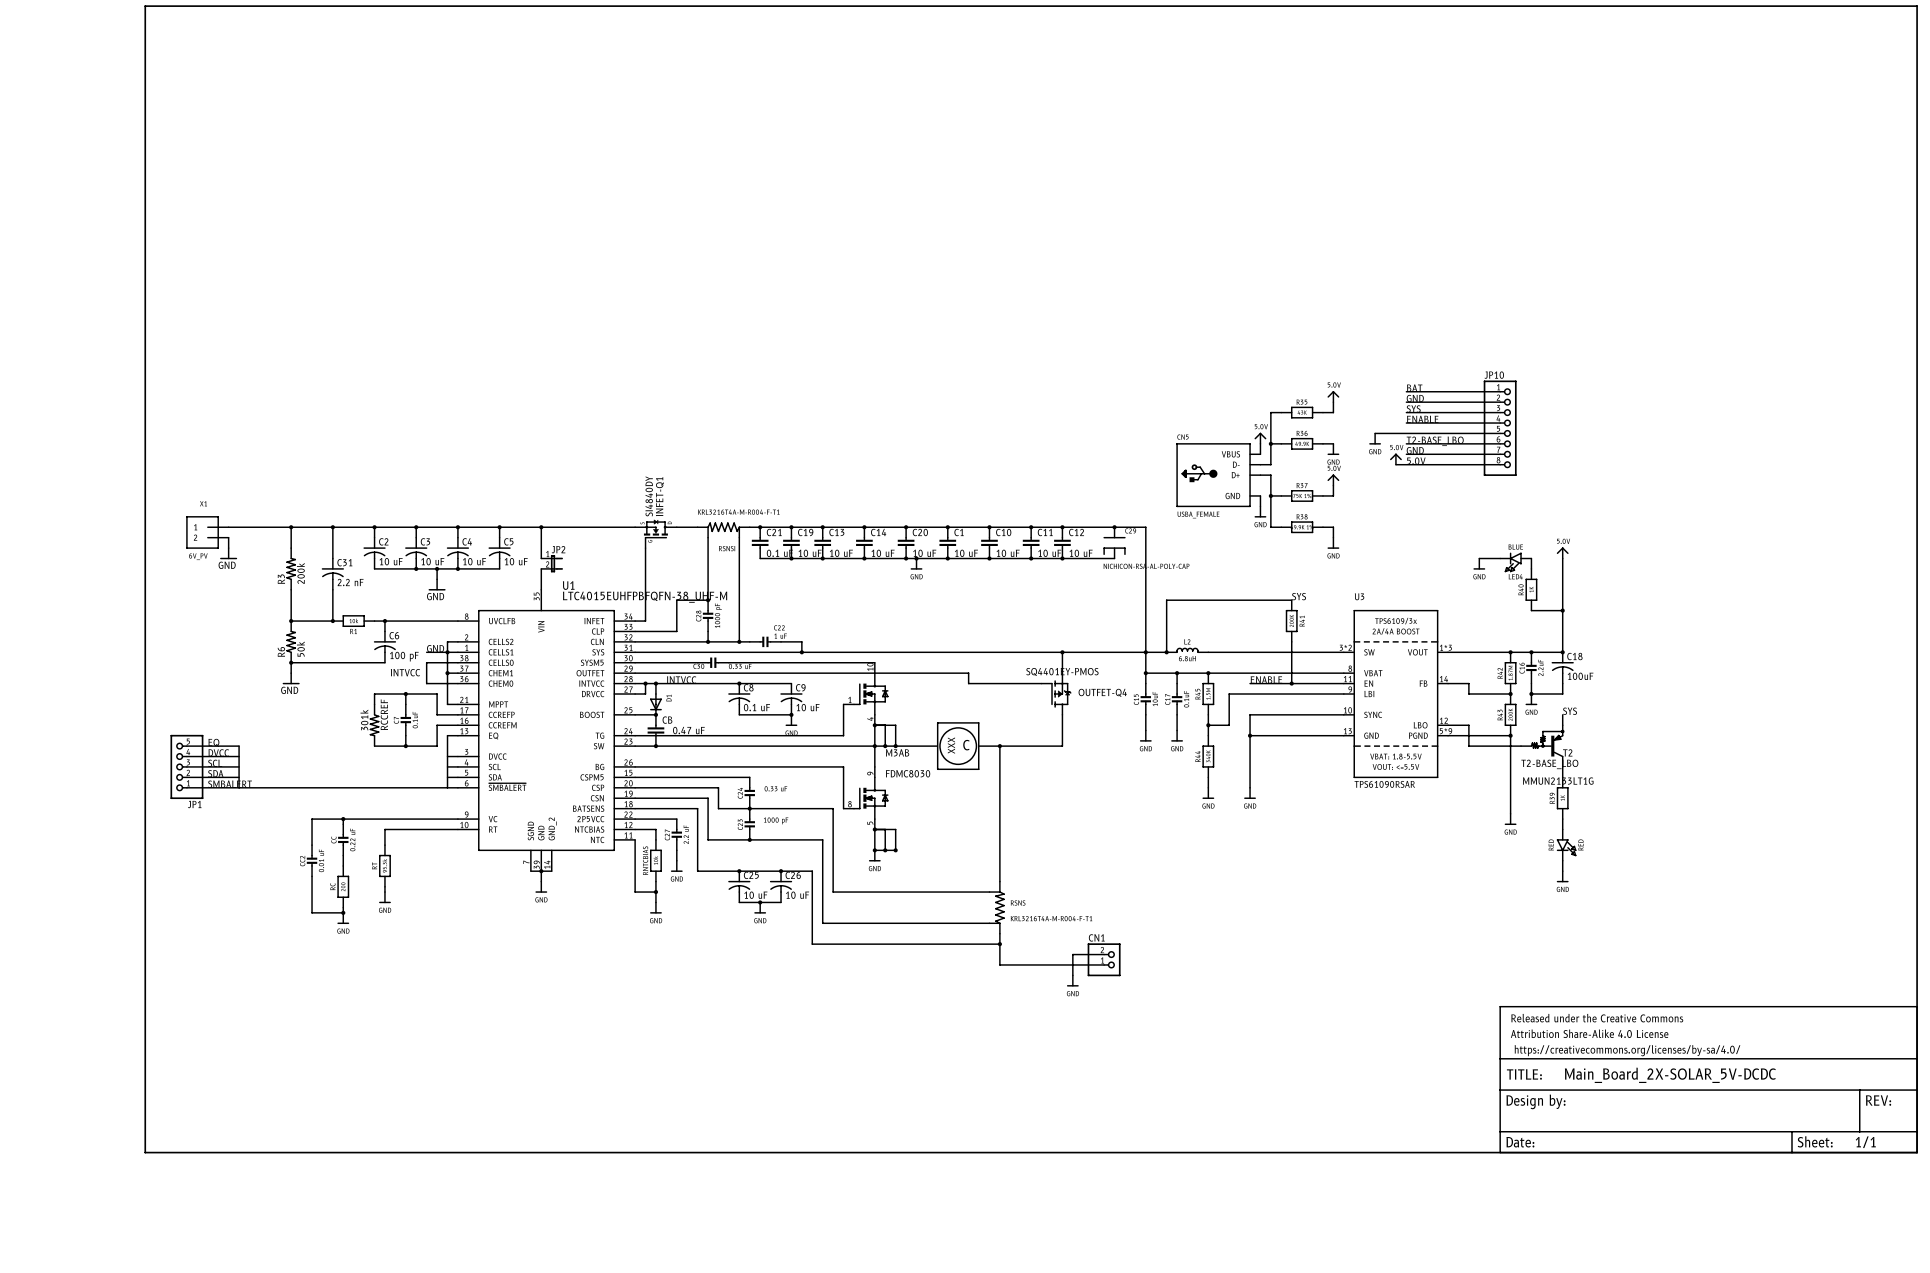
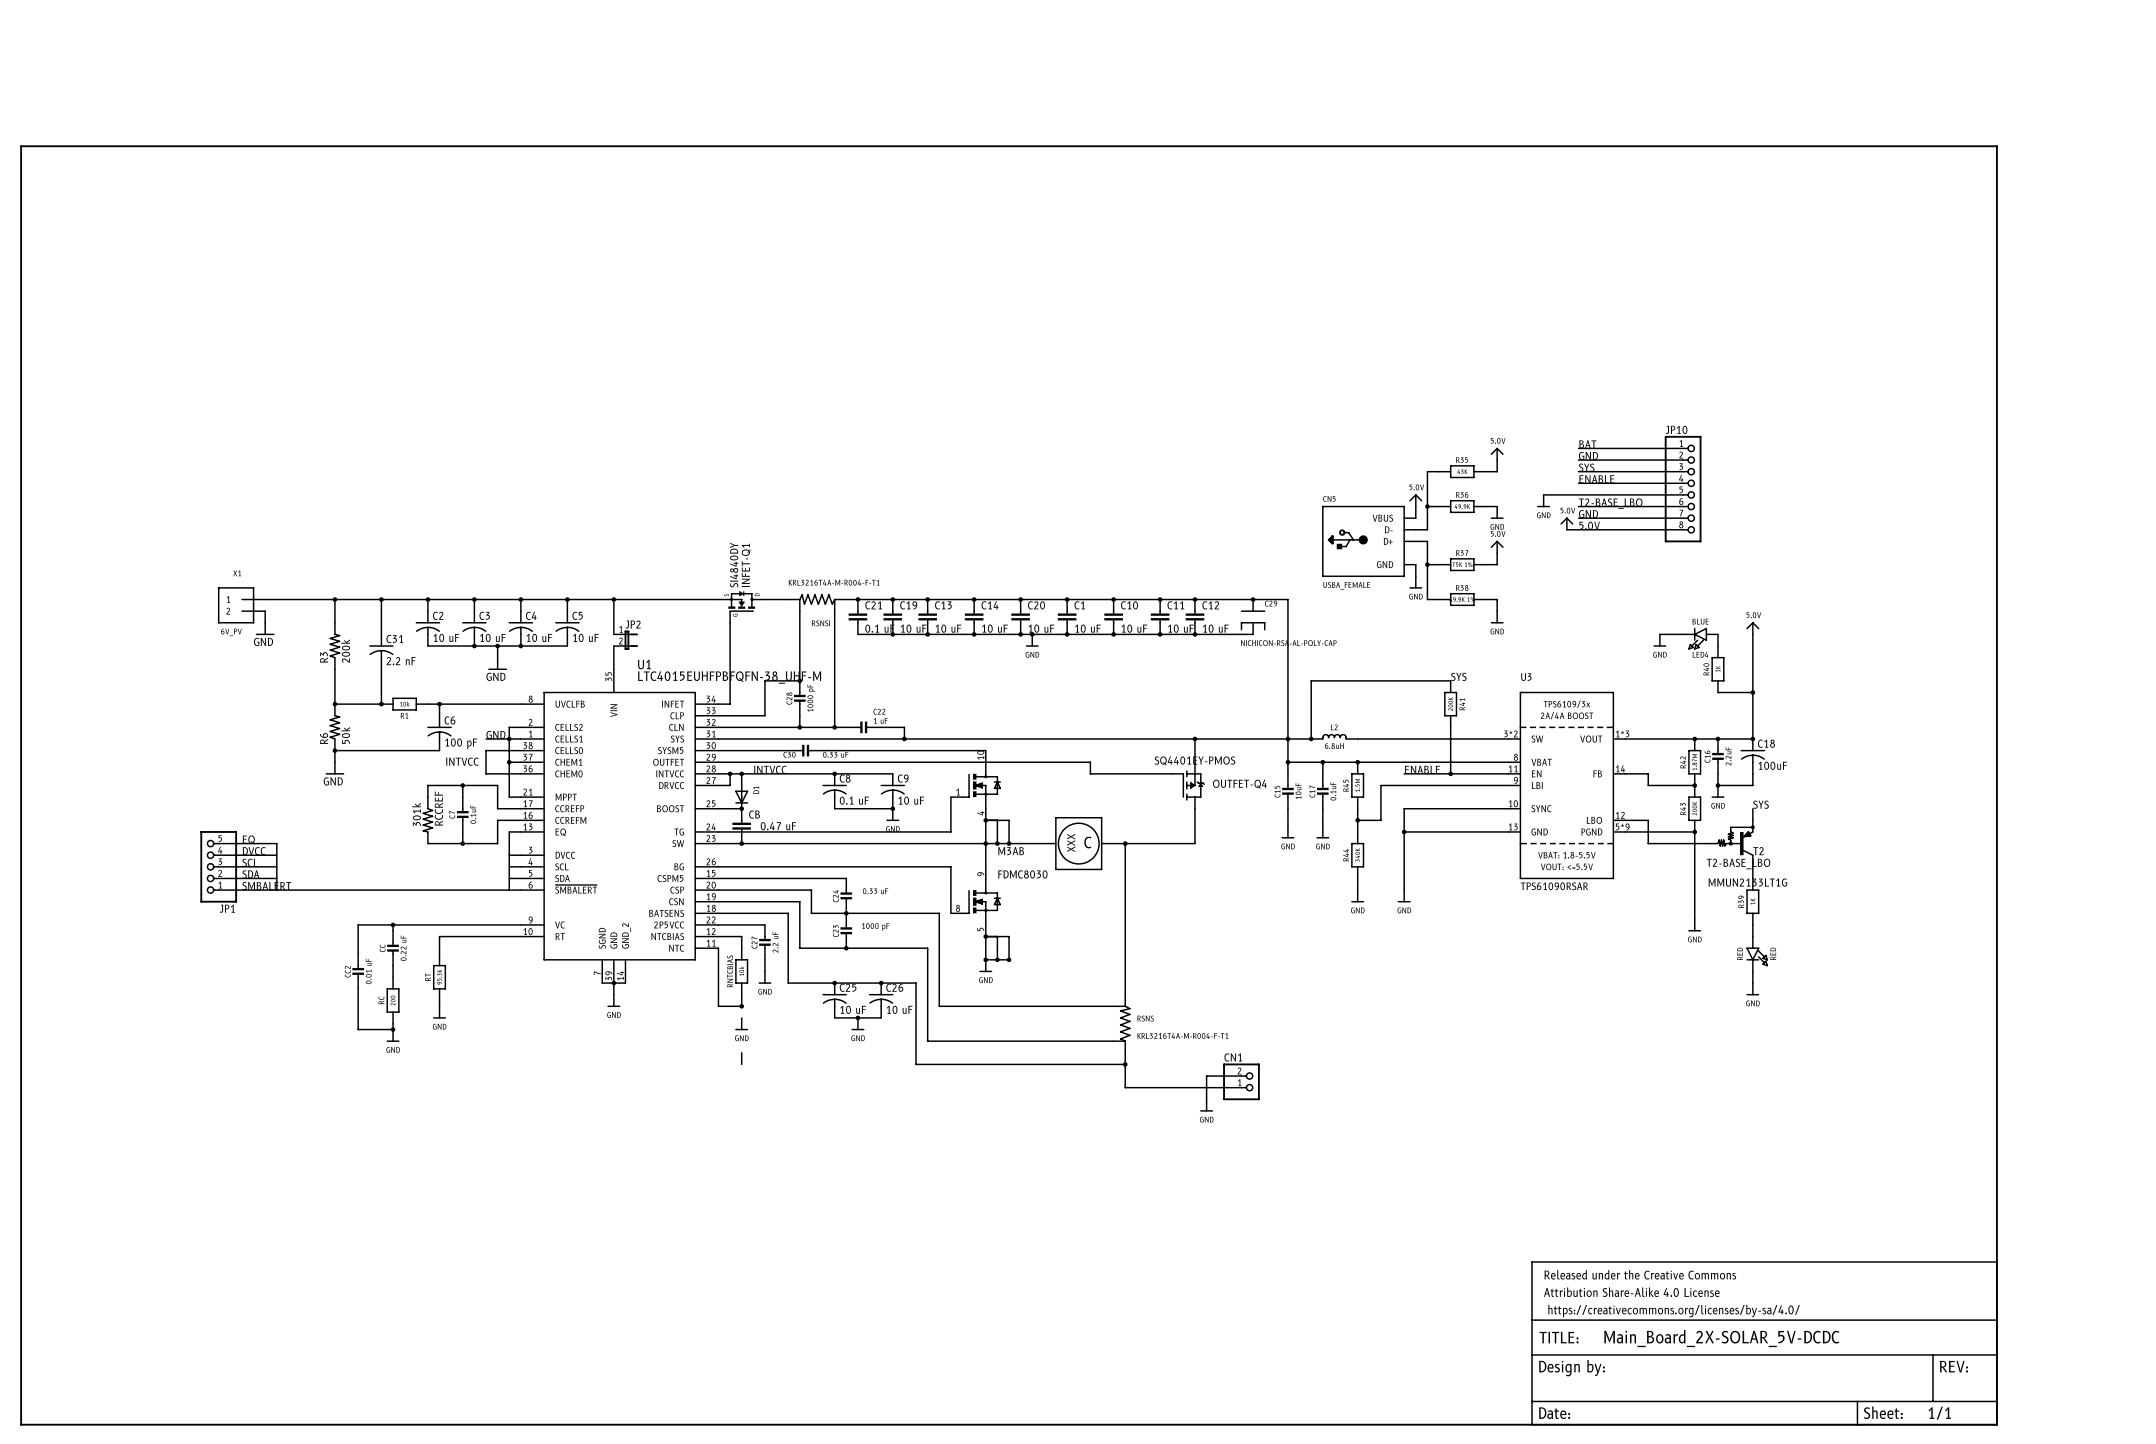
part: (1031, 579) -> none
part: none -> (1009, 785)
wire: (655, 892) (655, 902) -> (741, 1052) (741, 1064)
part: (1708, 1079) -> none
part: none -> (1764, 1343)

